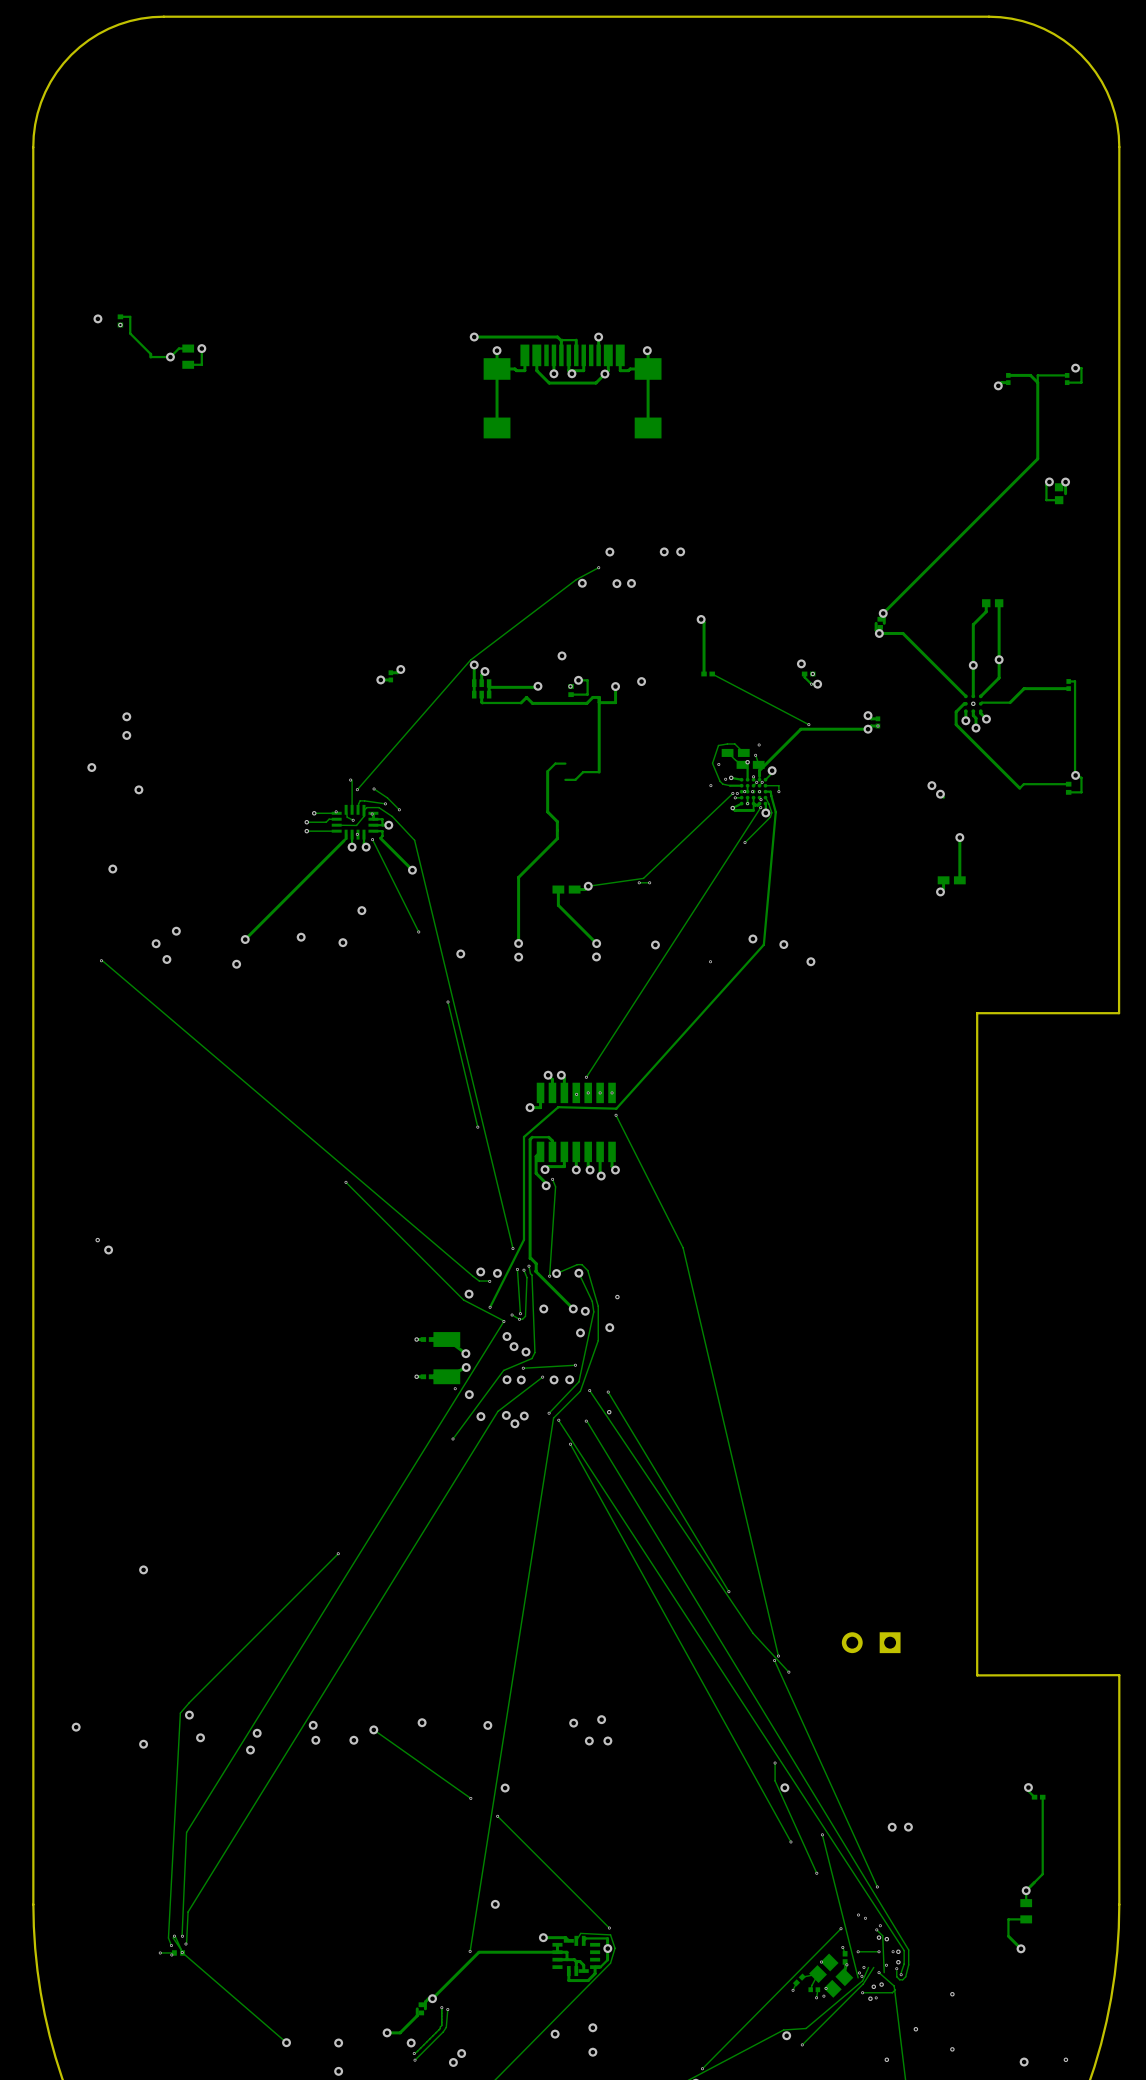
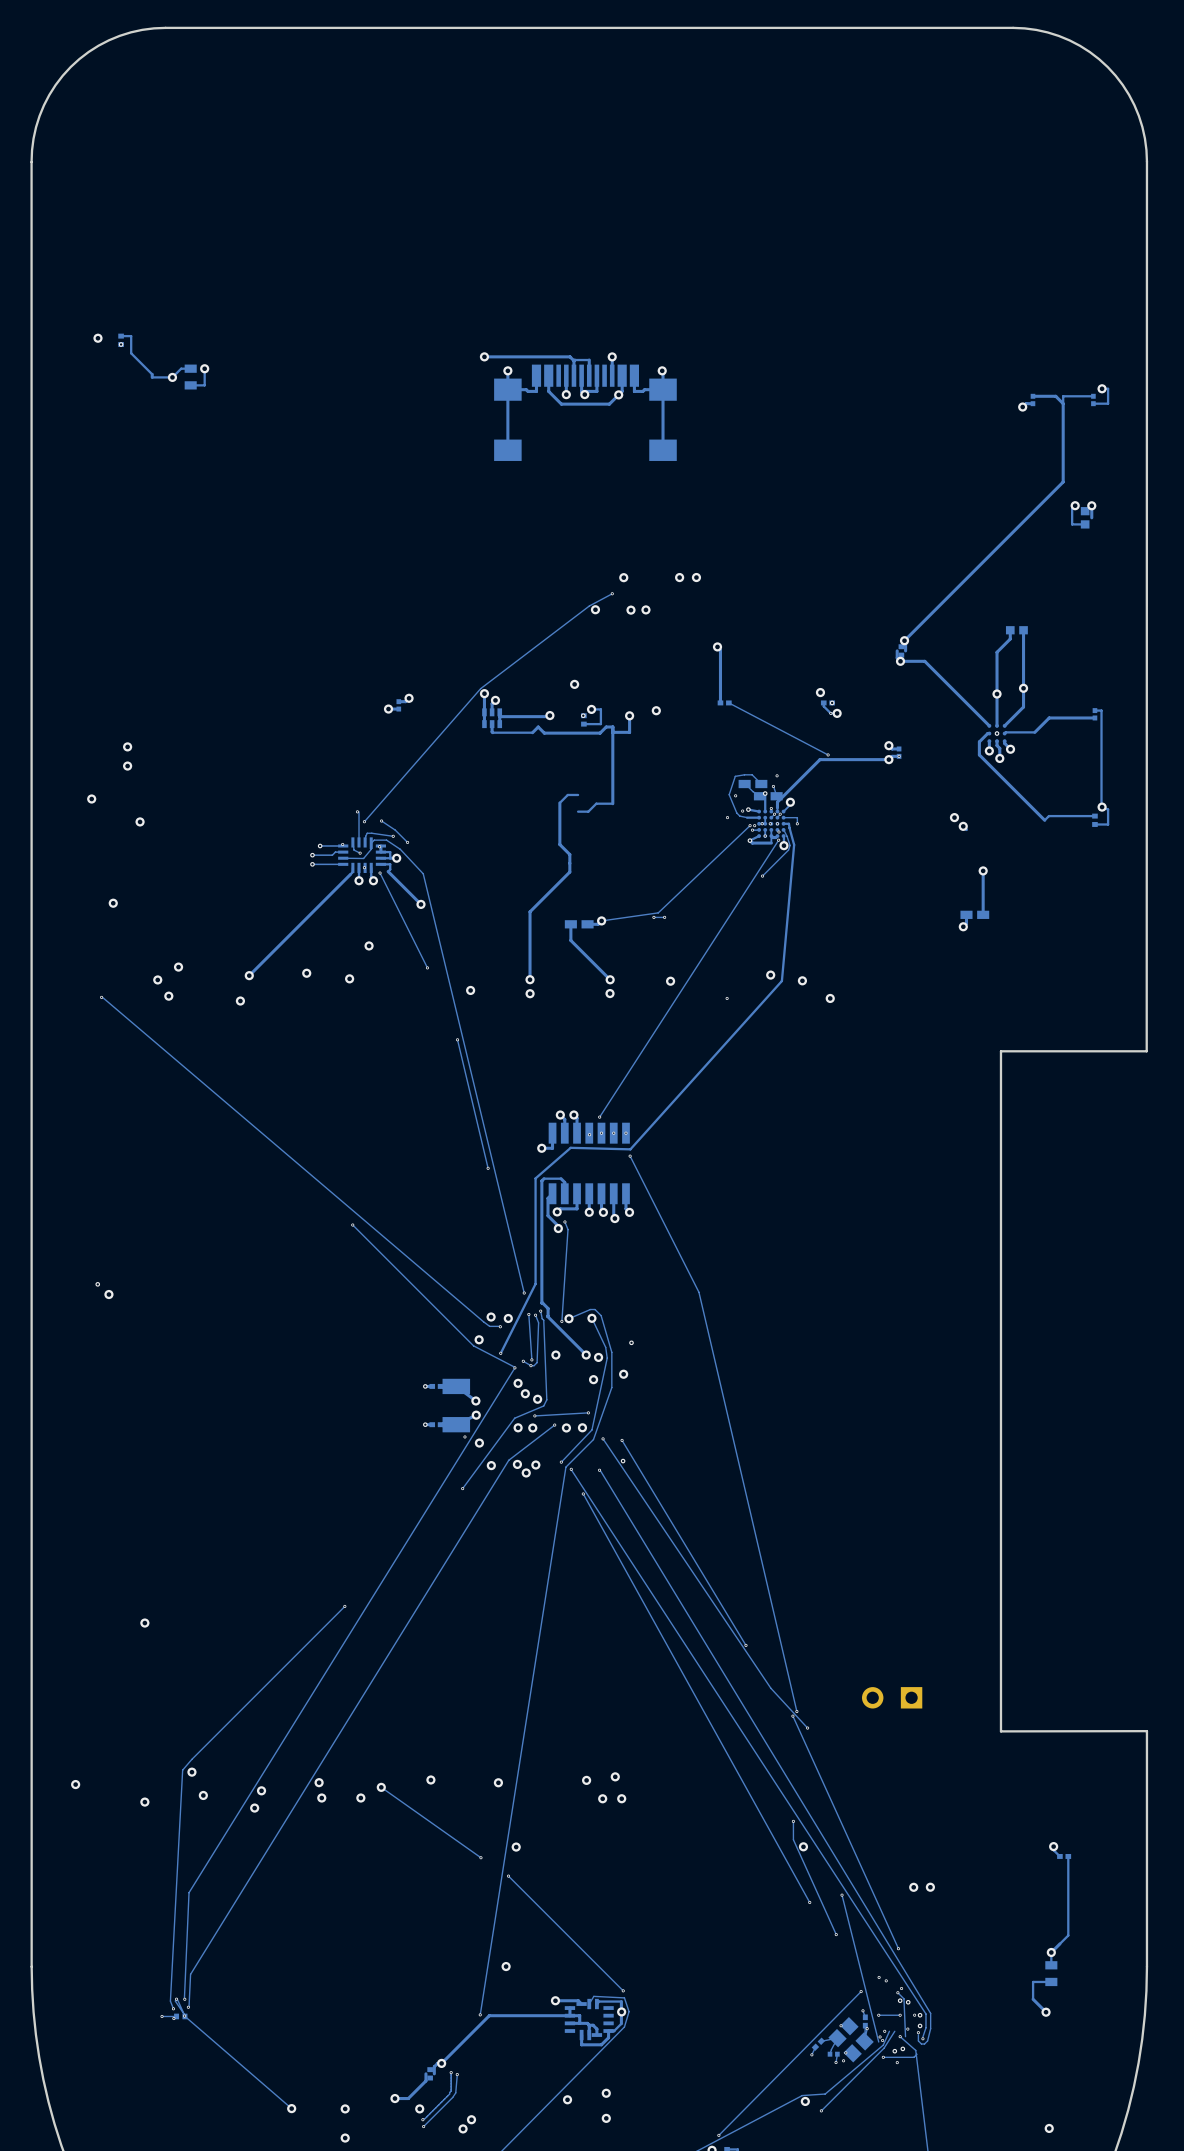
via: (952, 1994) -> none
via: (870, 1998) -> none
via: (915, 2029) -> none
via: (952, 2049) -> none
via: (886, 2059) -> none
via: (1065, 2059) -> none

